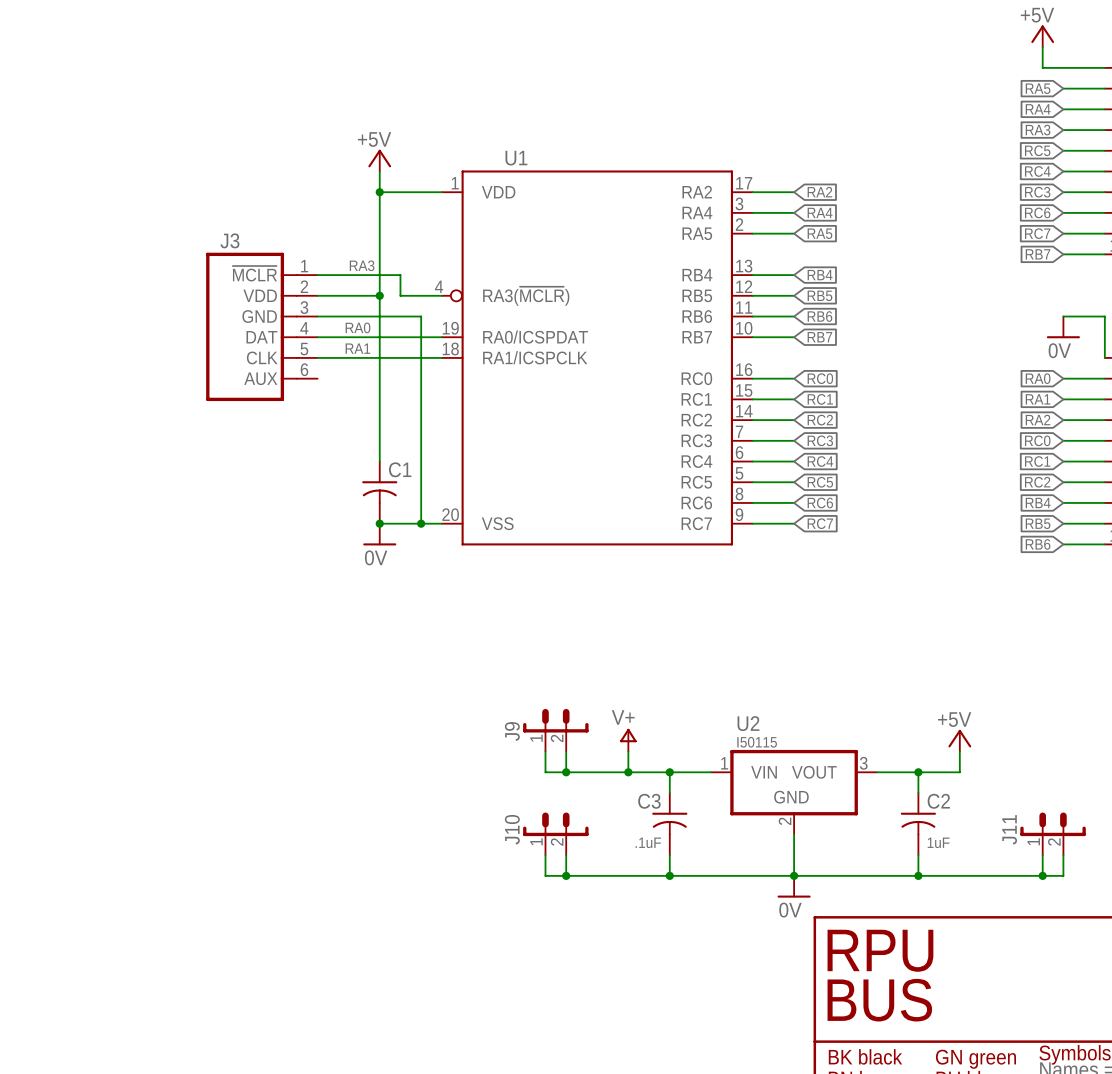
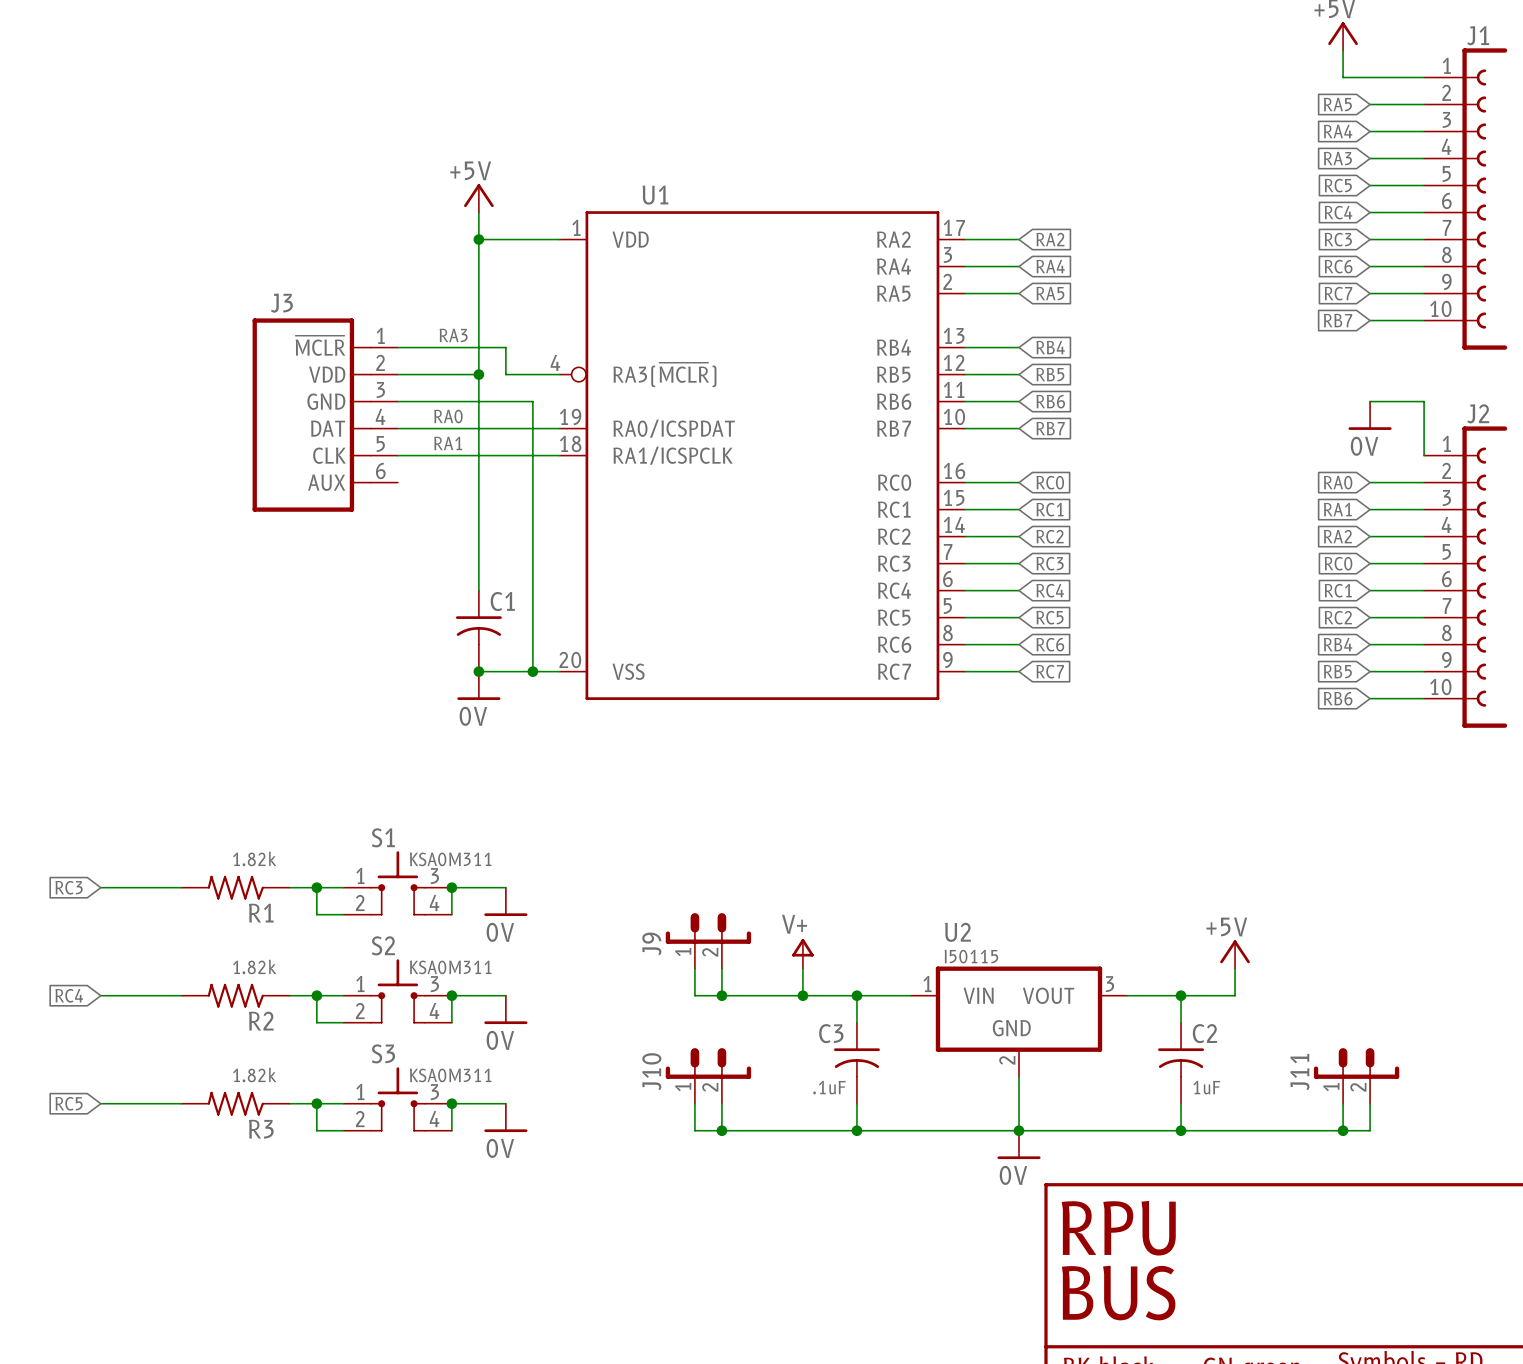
S1: none -> KSA0M311 (397, 883)
global label: none -> RC3 (69, 887)
wire: none -> (100, 887) (181, 887)
R1: none -> 1.82k (235, 887)
wire: none -> (289, 887) (343, 887)
wire: none -> (316, 887) (316, 914) (343, 914)
junction: none -> (316, 887)
junction: none -> (451, 887)
wire: none -> (505, 887) (451, 887) (451, 914)
power symbol: none -> 0V (505, 901)
S2: none -> KSA0M311 (397, 991)
global label: none -> RC4 (69, 995)
wire: none -> (100, 995) (181, 995)
R2: none -> 1.82k (235, 995)
wire: none -> (289, 995) (343, 995)
wire: none -> (316, 995) (316, 1022) (343, 1022)
junction: none -> (316, 995)
junction: none -> (451, 995)
wire: none -> (505, 995) (451, 995) (451, 1022)
power symbol: none -> 0V (505, 1009)
S3: none -> KSA0M311 (397, 1099)
global label: none -> RC5 (69, 1103)
wire: none -> (100, 1103) (181, 1103)
R3: none -> 1.82k (235, 1103)
wire: none -> (289, 1103) (343, 1103)
wire: none -> (316, 1103) (316, 1130) (343, 1130)
junction: none -> (316, 1103)
junction: none -> (451, 1103)
wire: none -> (505, 1103) (451, 1103) (451, 1130)
power symbol: none -> 0V (505, 1117)

